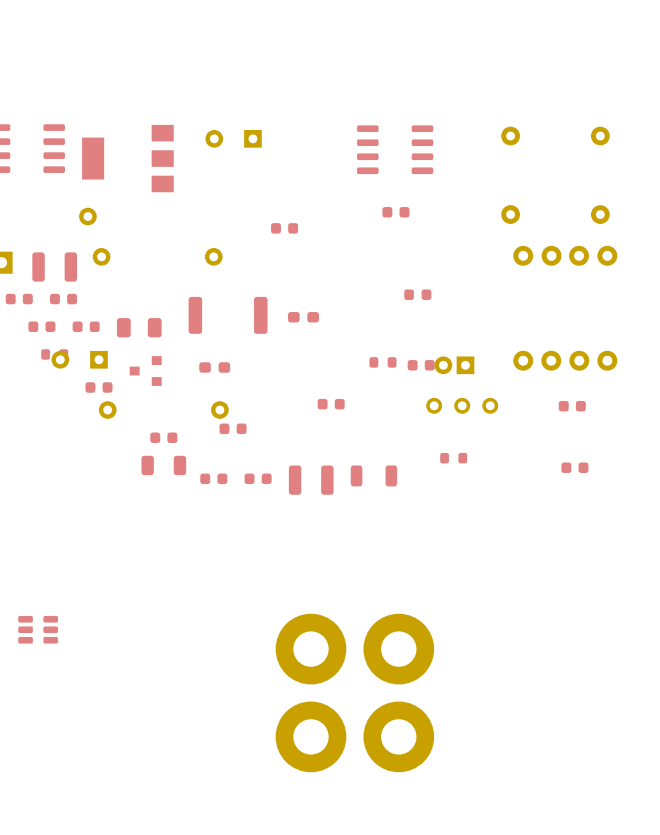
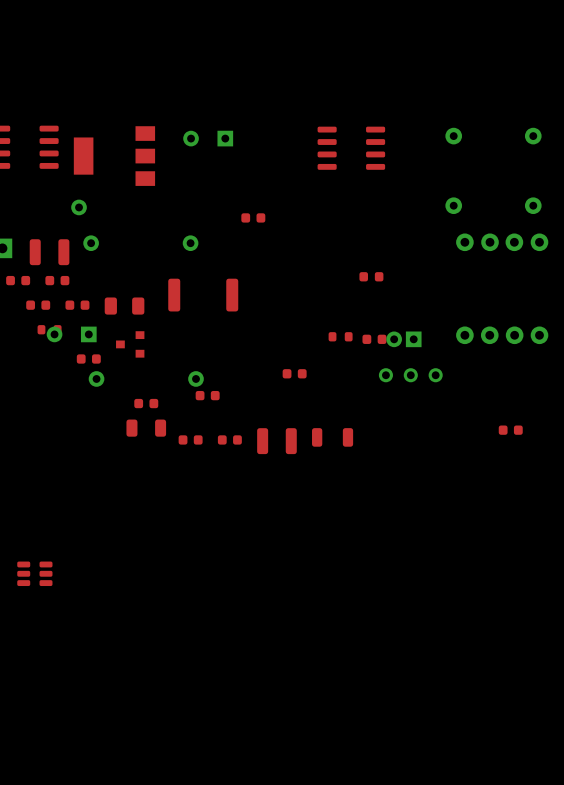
part: (395, 212) -> none
part: (303, 317) -> none
part: (214, 367) -> none
part: (572, 406) -> none
part: (453, 458) -> none
part: (311, 649) -> none
part: (398, 649) -> none
part: (311, 736) -> none
part: (398, 736) -> none

